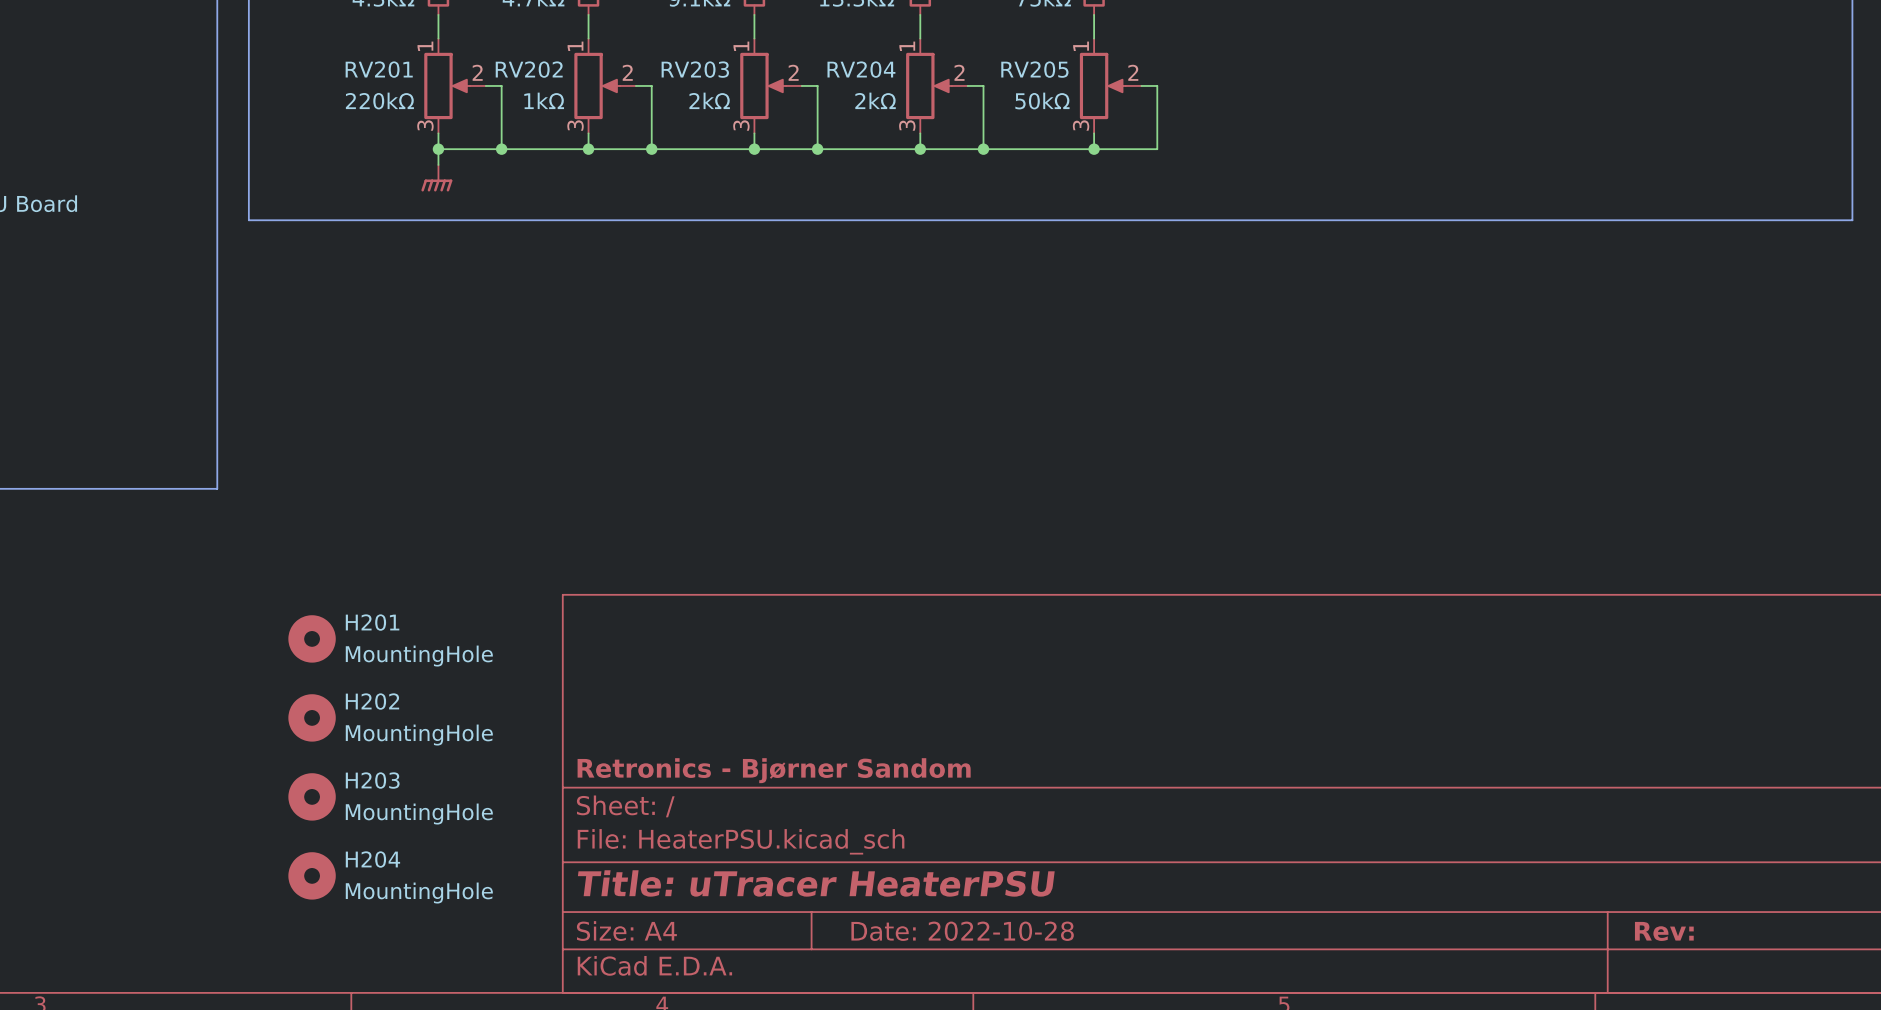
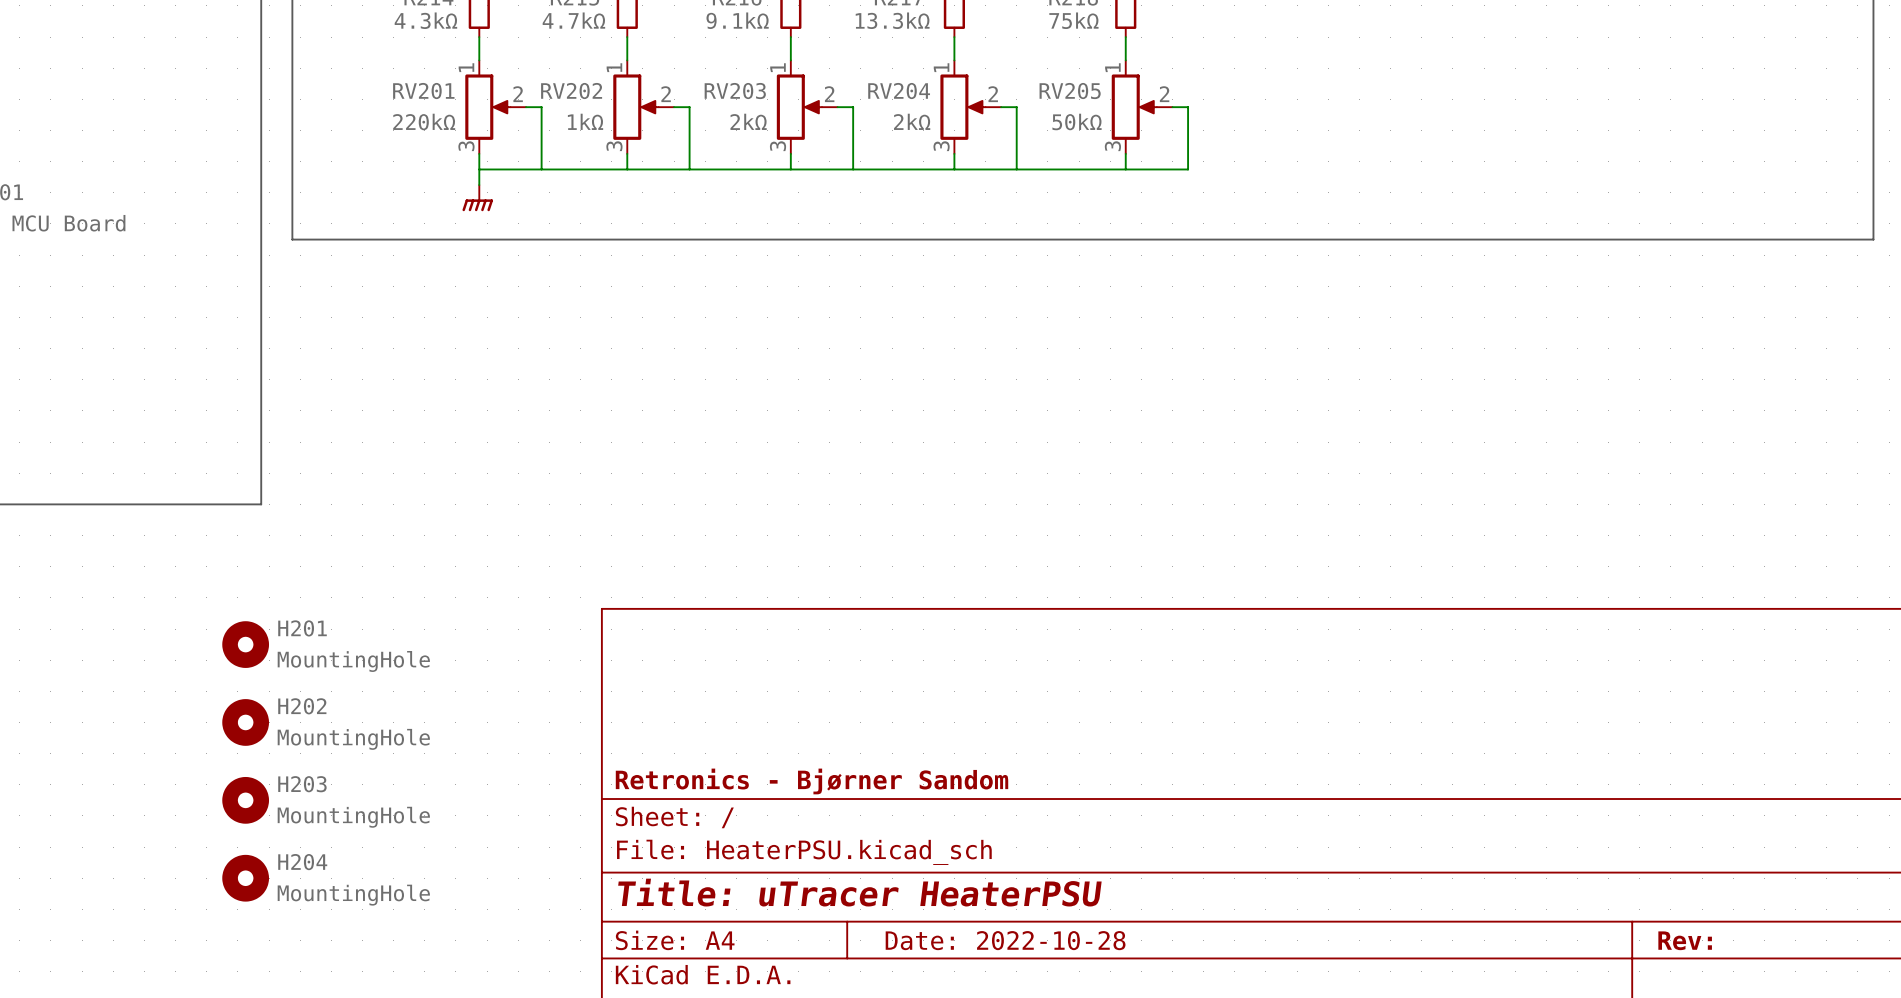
junction: (438, 149) -> none
junction: (501, 149) -> none
junction: (588, 149) -> none
junction: (651, 149) -> none
junction: (754, 149) -> none
junction: (817, 149) -> none
junction: (920, 149) -> none
junction: (983, 149) -> none
junction: (1094, 149) -> none
H201 position: (312, 638) -> (245, 644)
H202 position: (312, 717) -> (245, 722)
H203 position: (312, 796) -> (245, 800)
H204 position: (312, 875) -> (245, 878)

